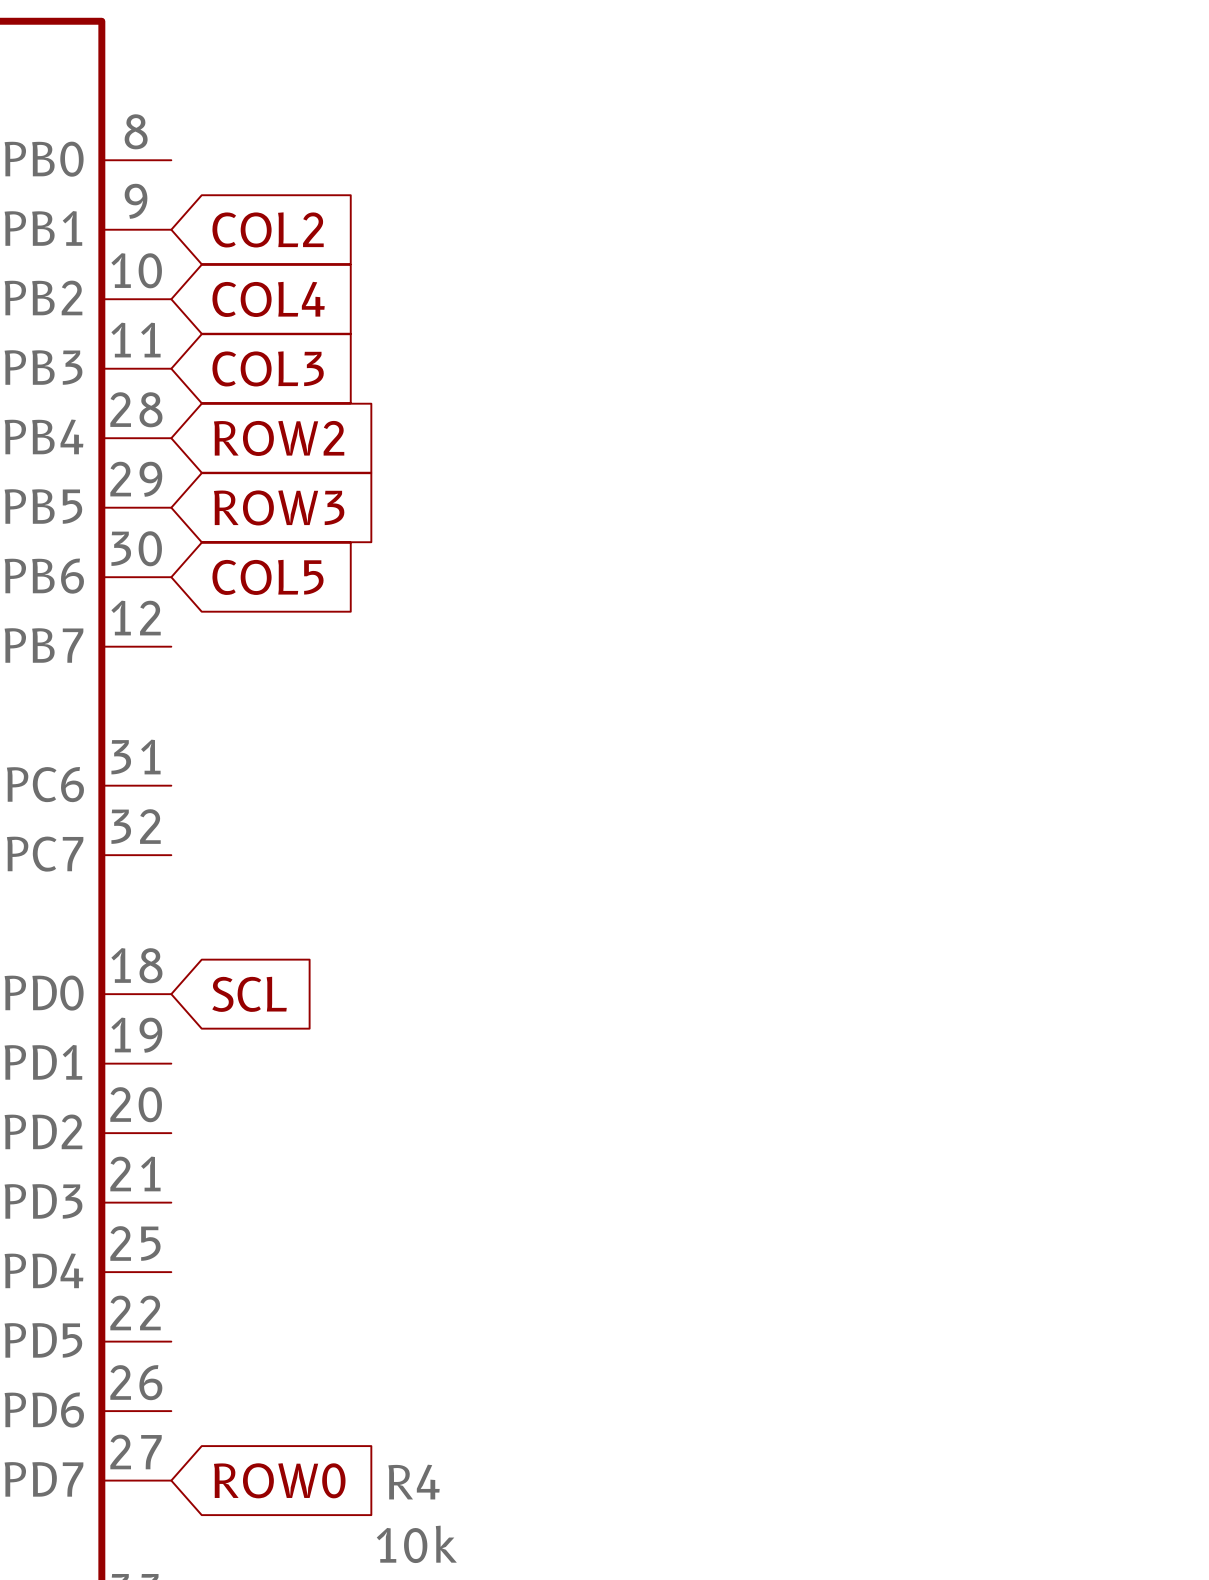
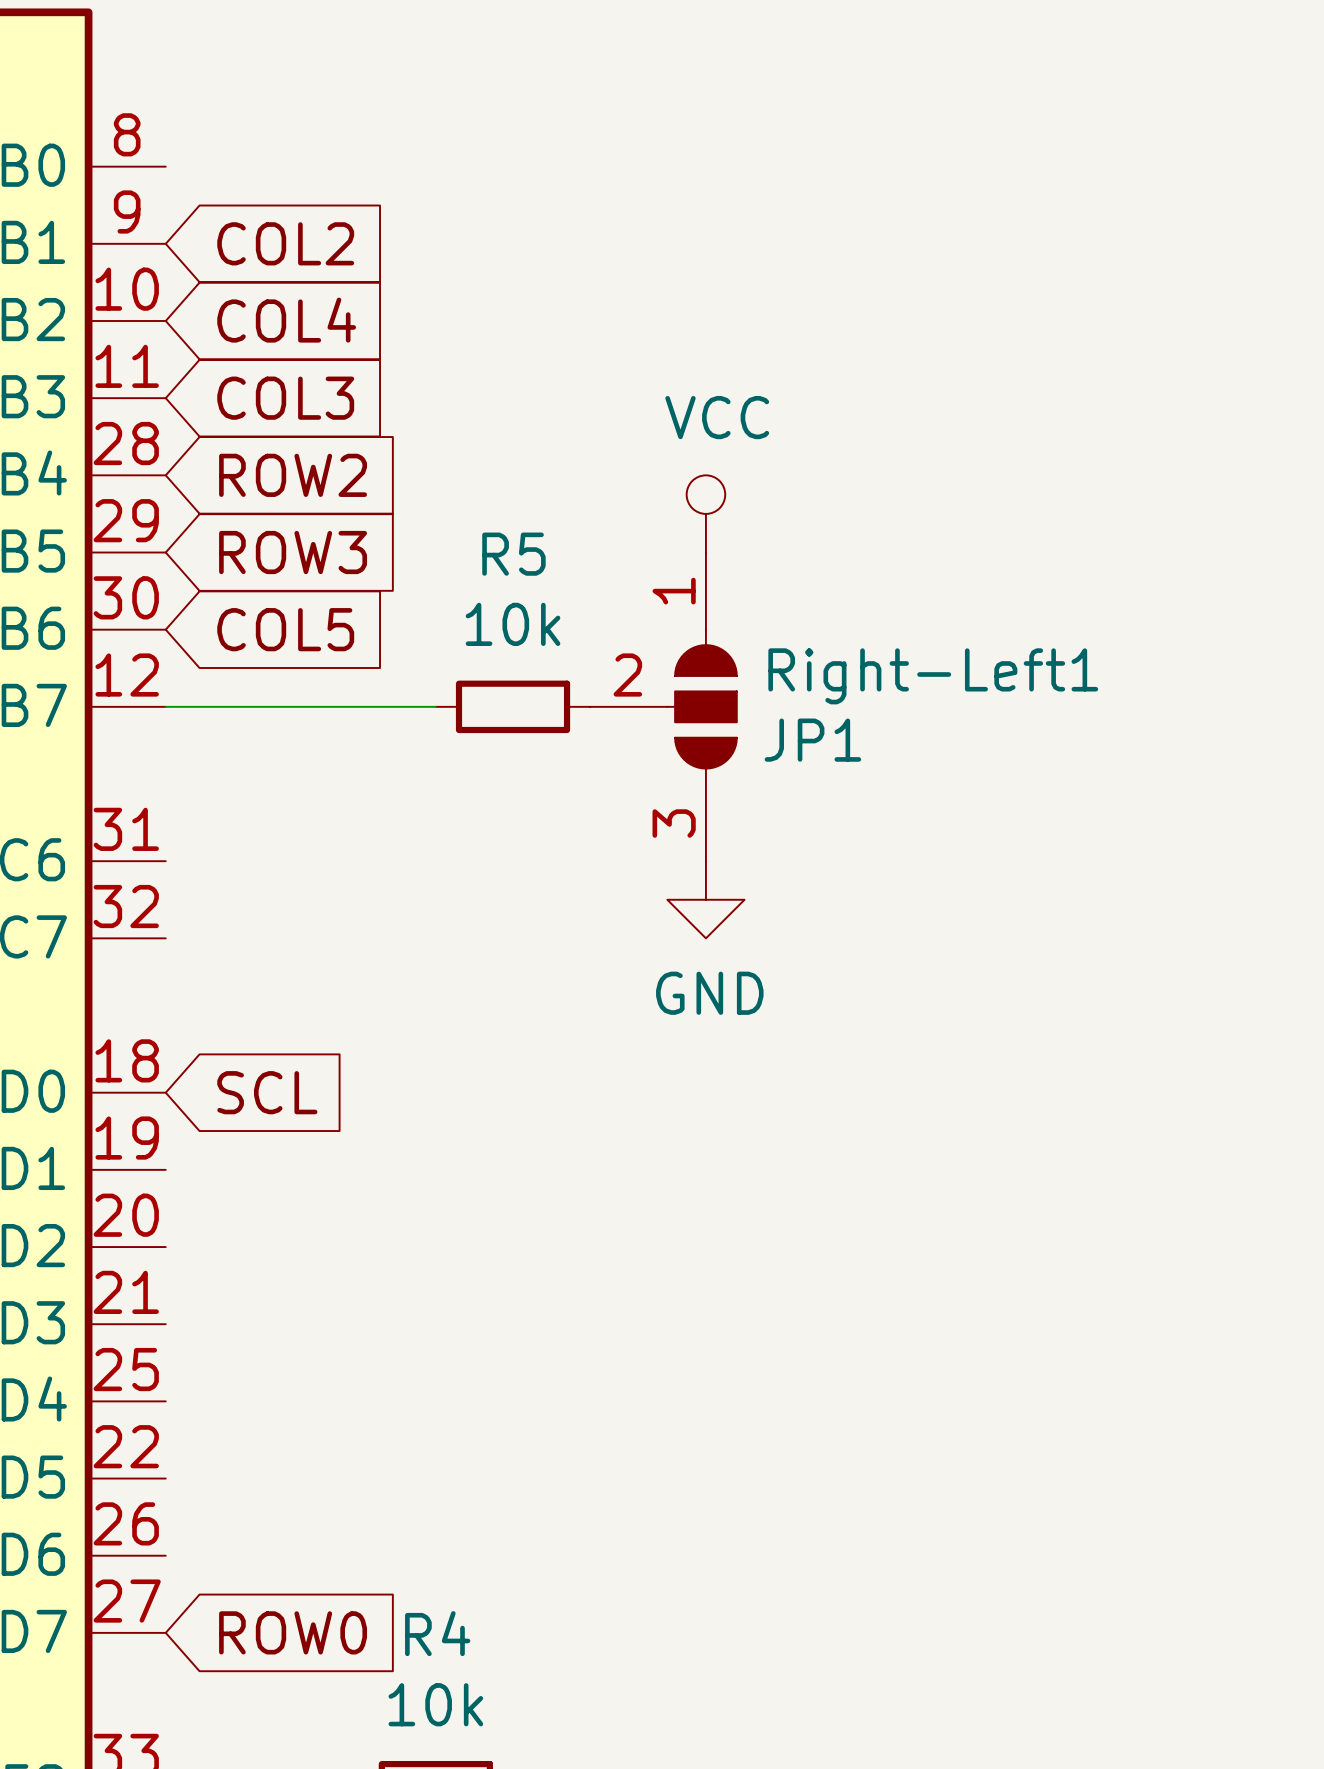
power symbol: none -> VCC (705, 513)
wire: none -> (165, 706) (435, 706)
R5: none -> 10k (513, 706)
Right-Left1: none -> JP1 (663, 706)
power symbol: none -> GND (705, 899)

